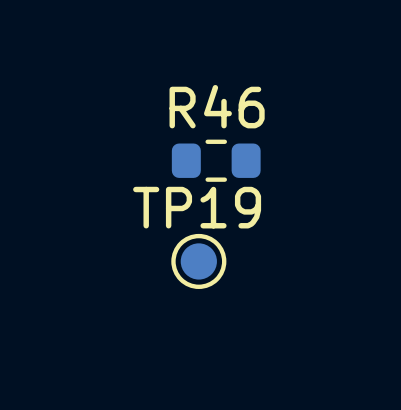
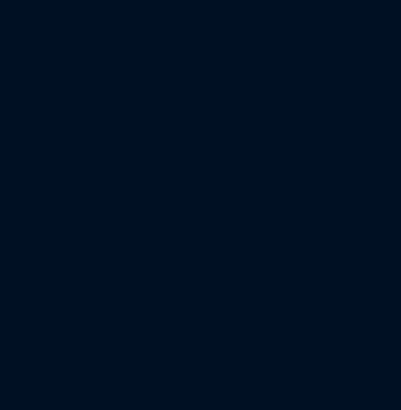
R46: (216, 160) -> none
TP19: (198, 261) -> none

